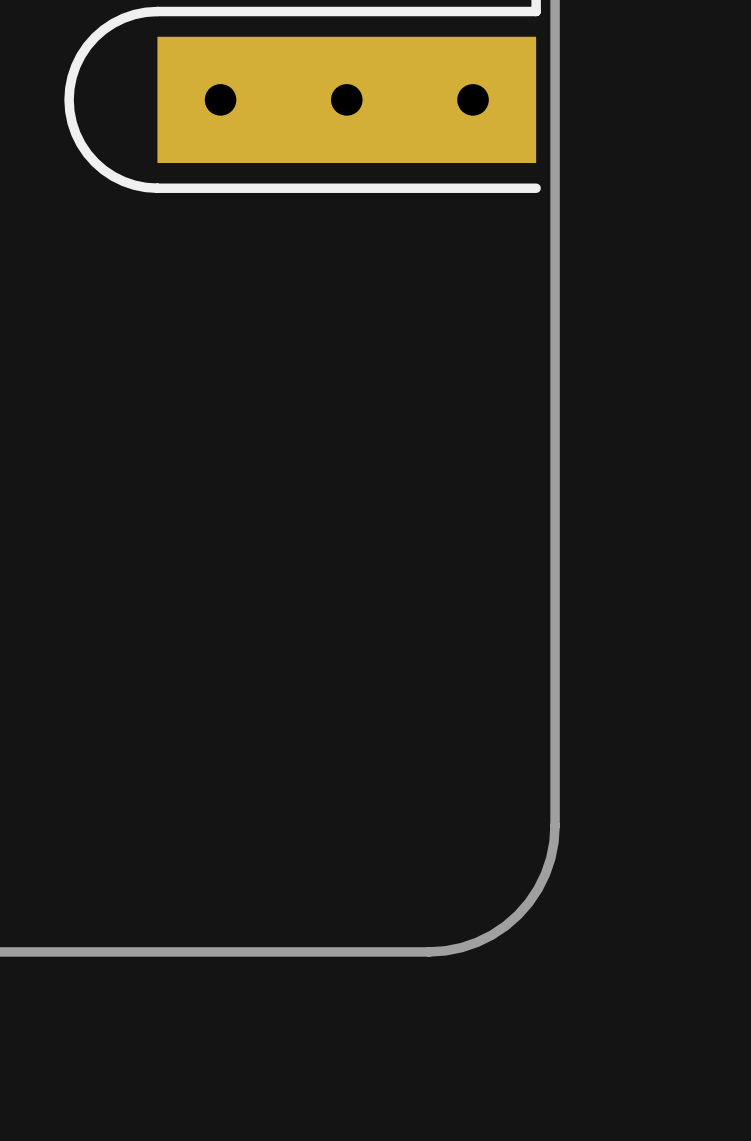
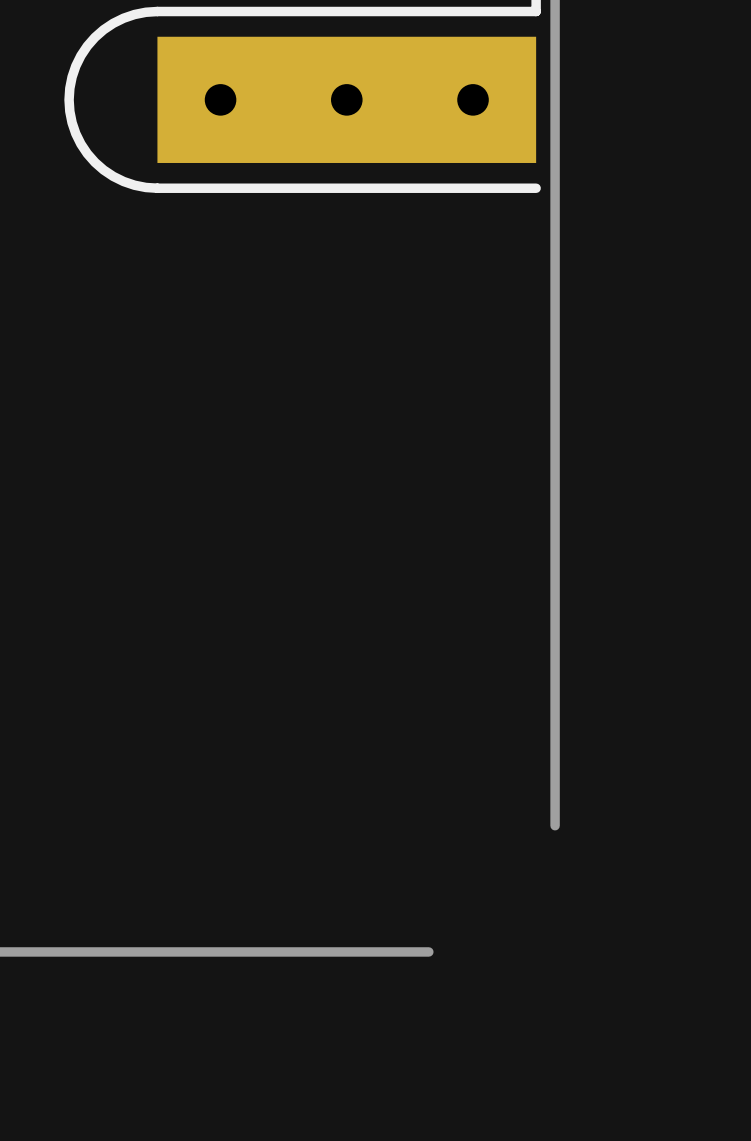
board edge: (555, 825) (553, 842) (545, 874) (528, 902) (518, 914) (491, 935) (477, 942) (461, 947) (428, 951) -> none

